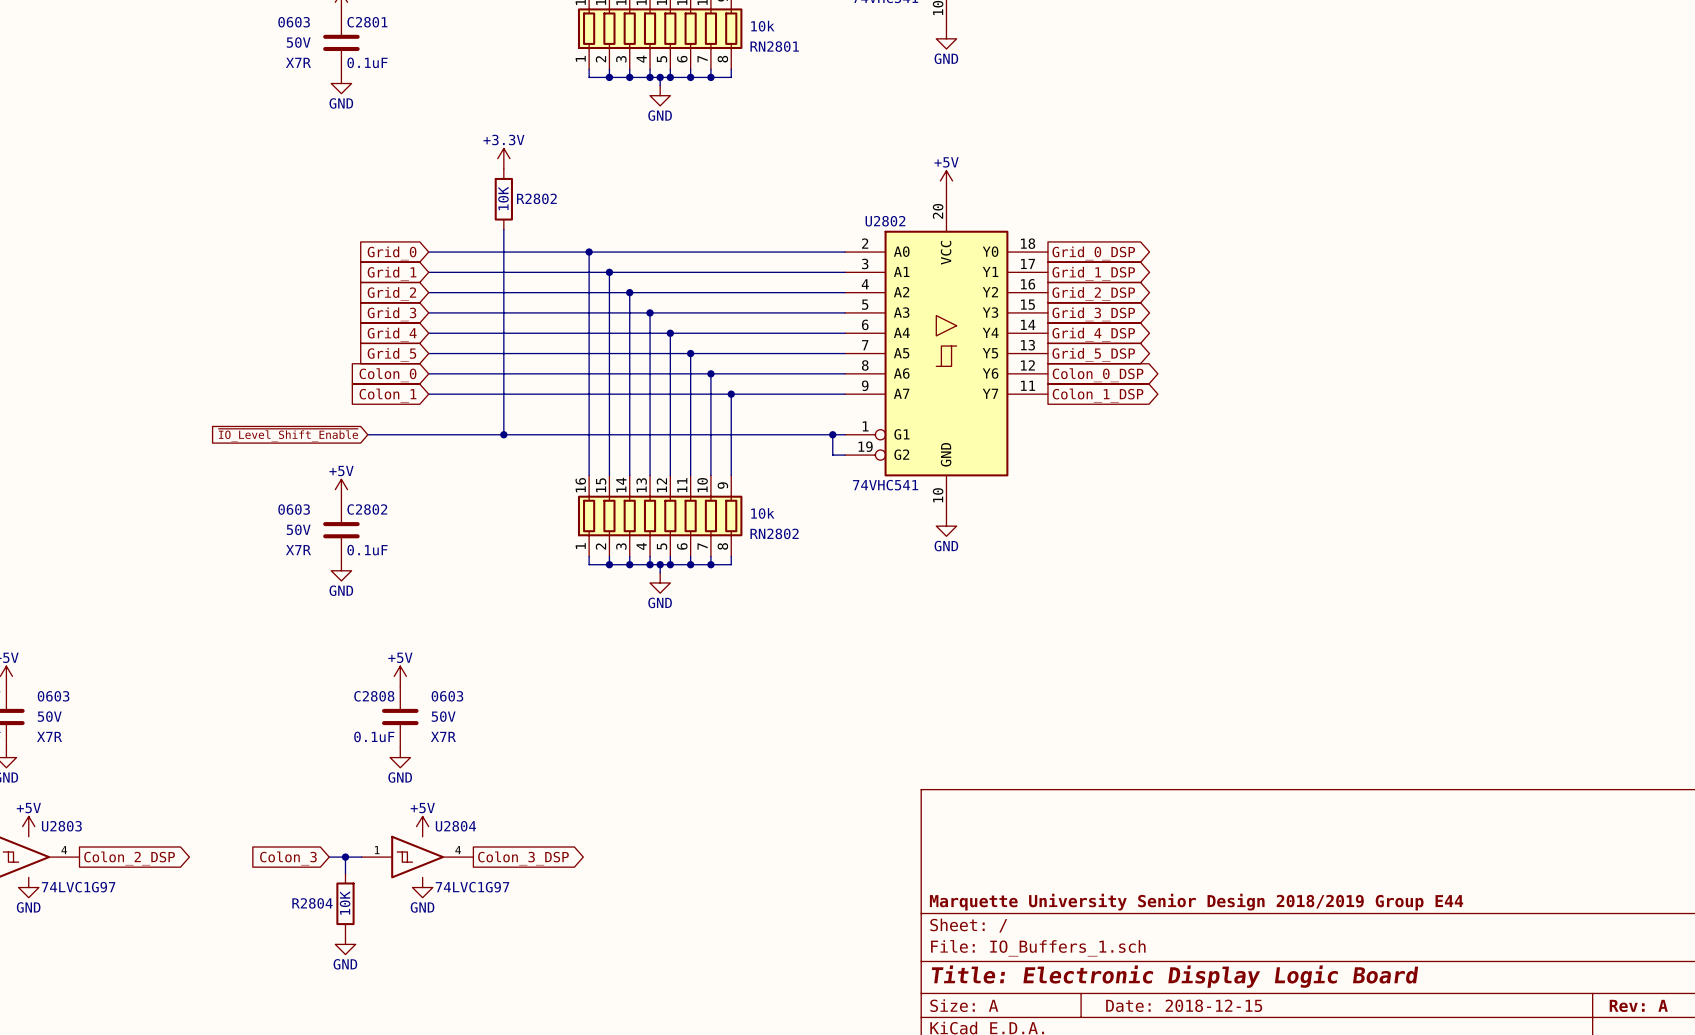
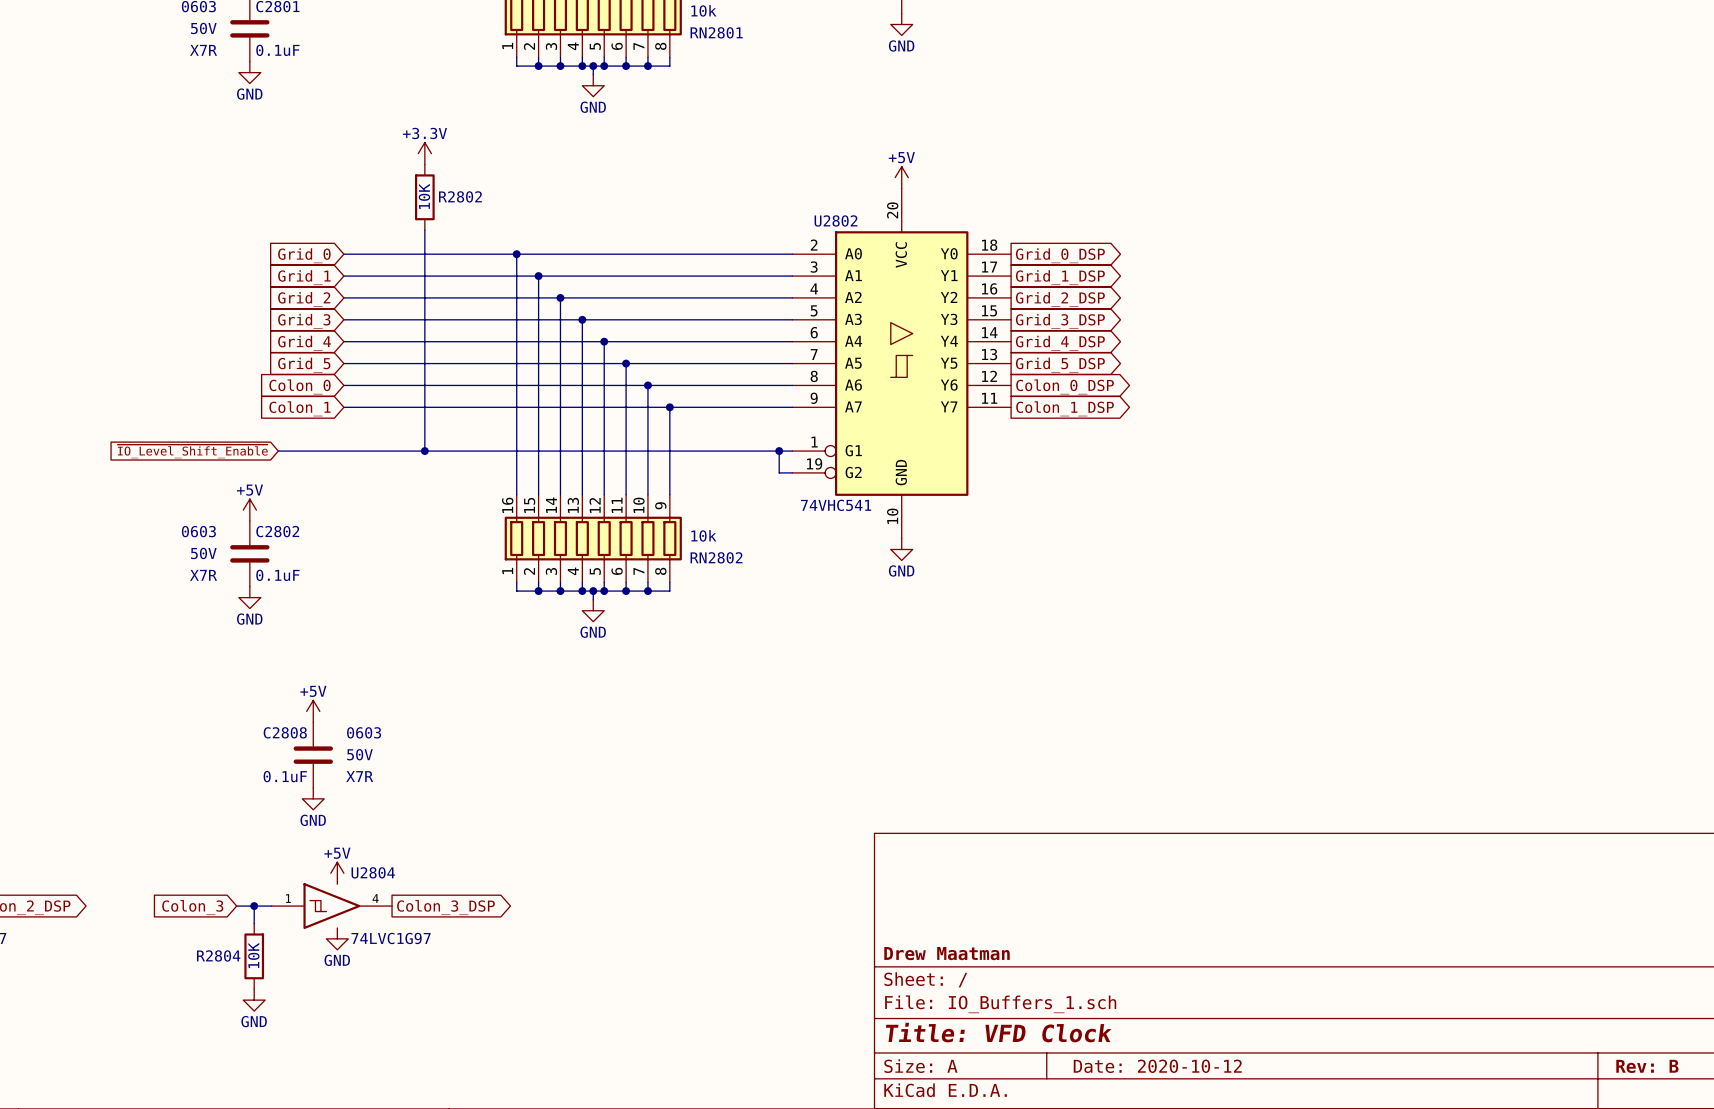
title block: Marquette University Senior Design 2018/2019 Group E44 (1196, 902) -> Drew Maatman (947, 953)
title block: Title: Electronic Display Logic Board (1174, 976) -> Title: VFD Clock (998, 1032)
title block: Date: 2018-12-15 (1184, 1005) -> Date: 2020-10-12 (1157, 1066)
title block: Rev: A (1638, 1005) -> Rev: B (1647, 1066)

